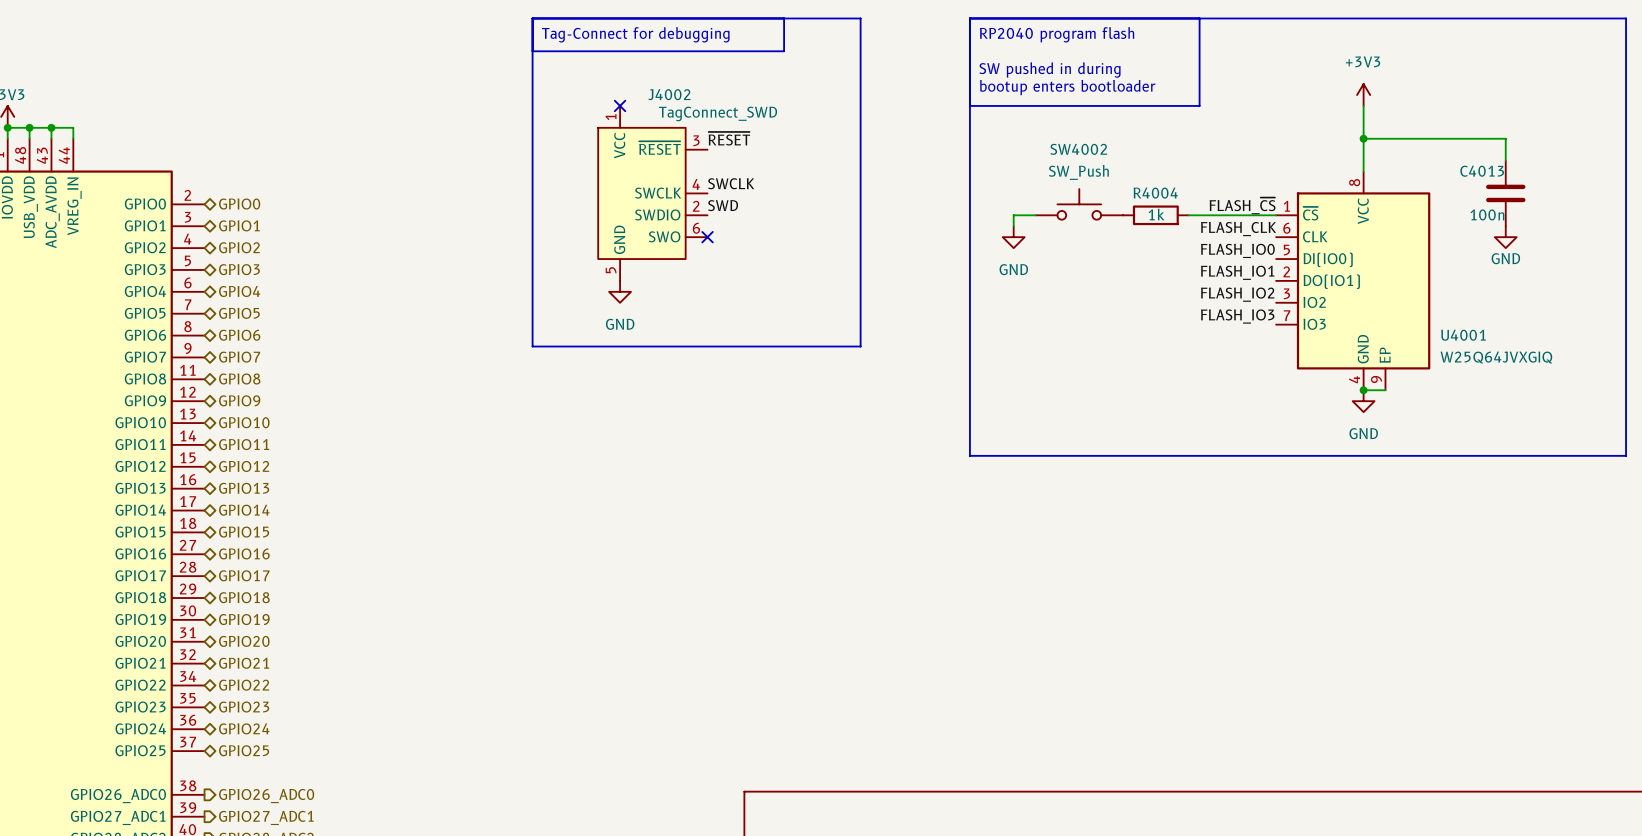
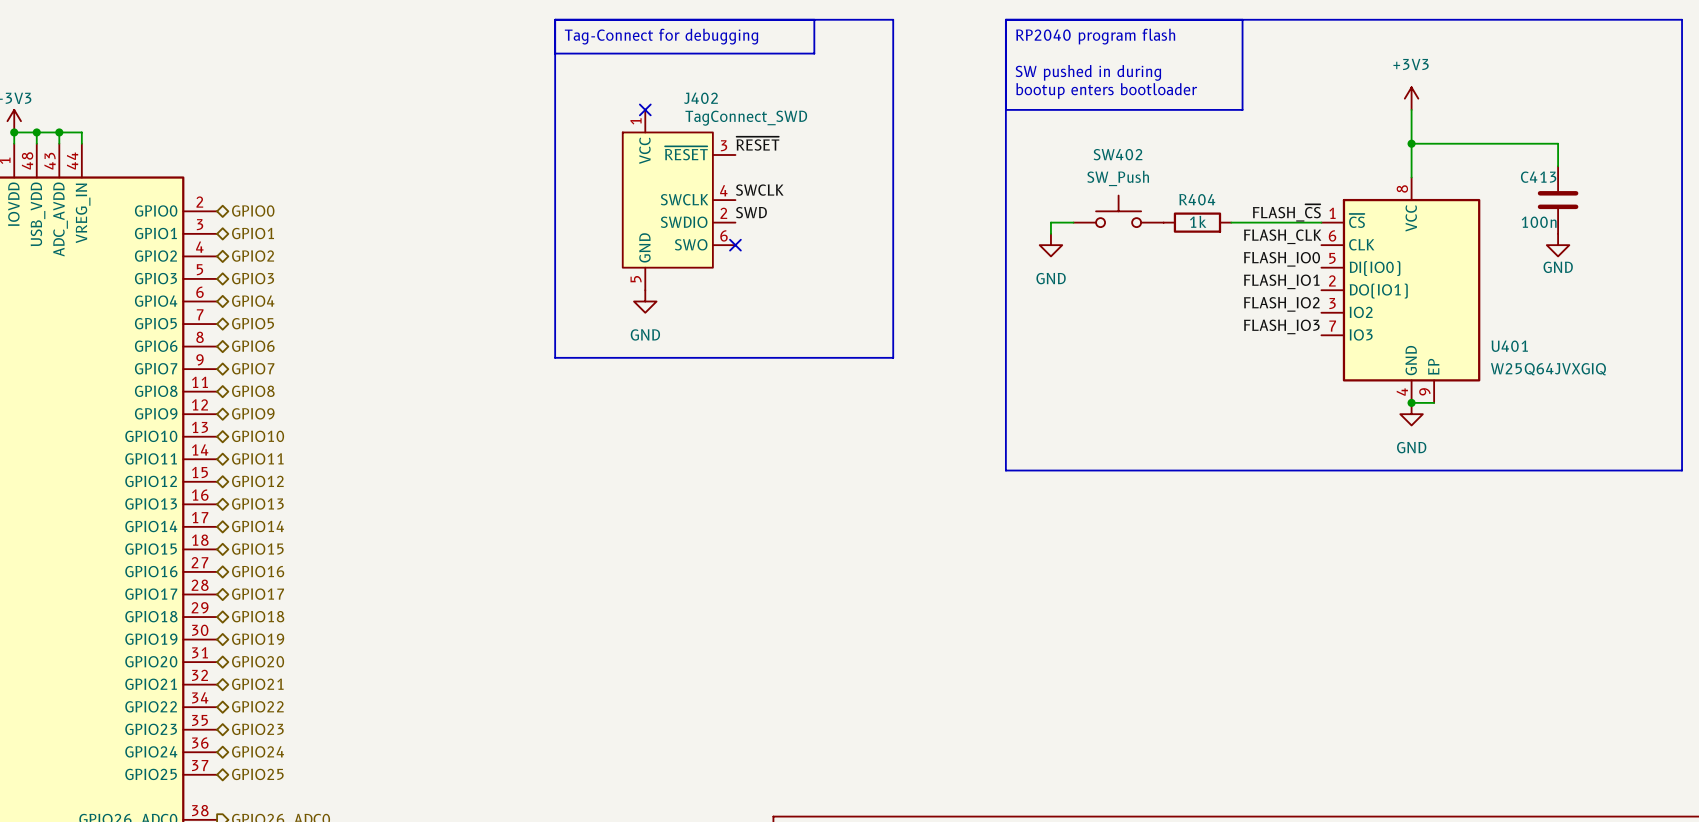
J4002 name: J4002 (669, 94) -> J402 (700, 98)
SW4002 name: SW4002 (1078, 149) -> SW402 (1117, 154)
C4013 name: C4013 (1482, 171) -> C413 (1538, 177)
R4004 name: R4004 (1155, 193) -> R404 (1197, 199)
U4001 name: U4001 (1463, 335) -> U401 (1509, 346)

